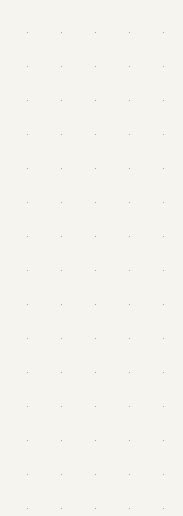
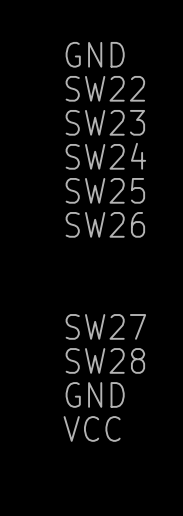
label: none -> GND (95, 54)
label: none -> SW22 (105, 88)
label: none -> SW23 (105, 122)
label: none -> SW24 (105, 156)
label: none -> SW25 (105, 190)
label: none -> SW26 (105, 224)
label: none -> SW27 (105, 326)
label: none -> SW28 (105, 360)
label: none -> GND (95, 394)
label: none -> VCC (92, 428)

